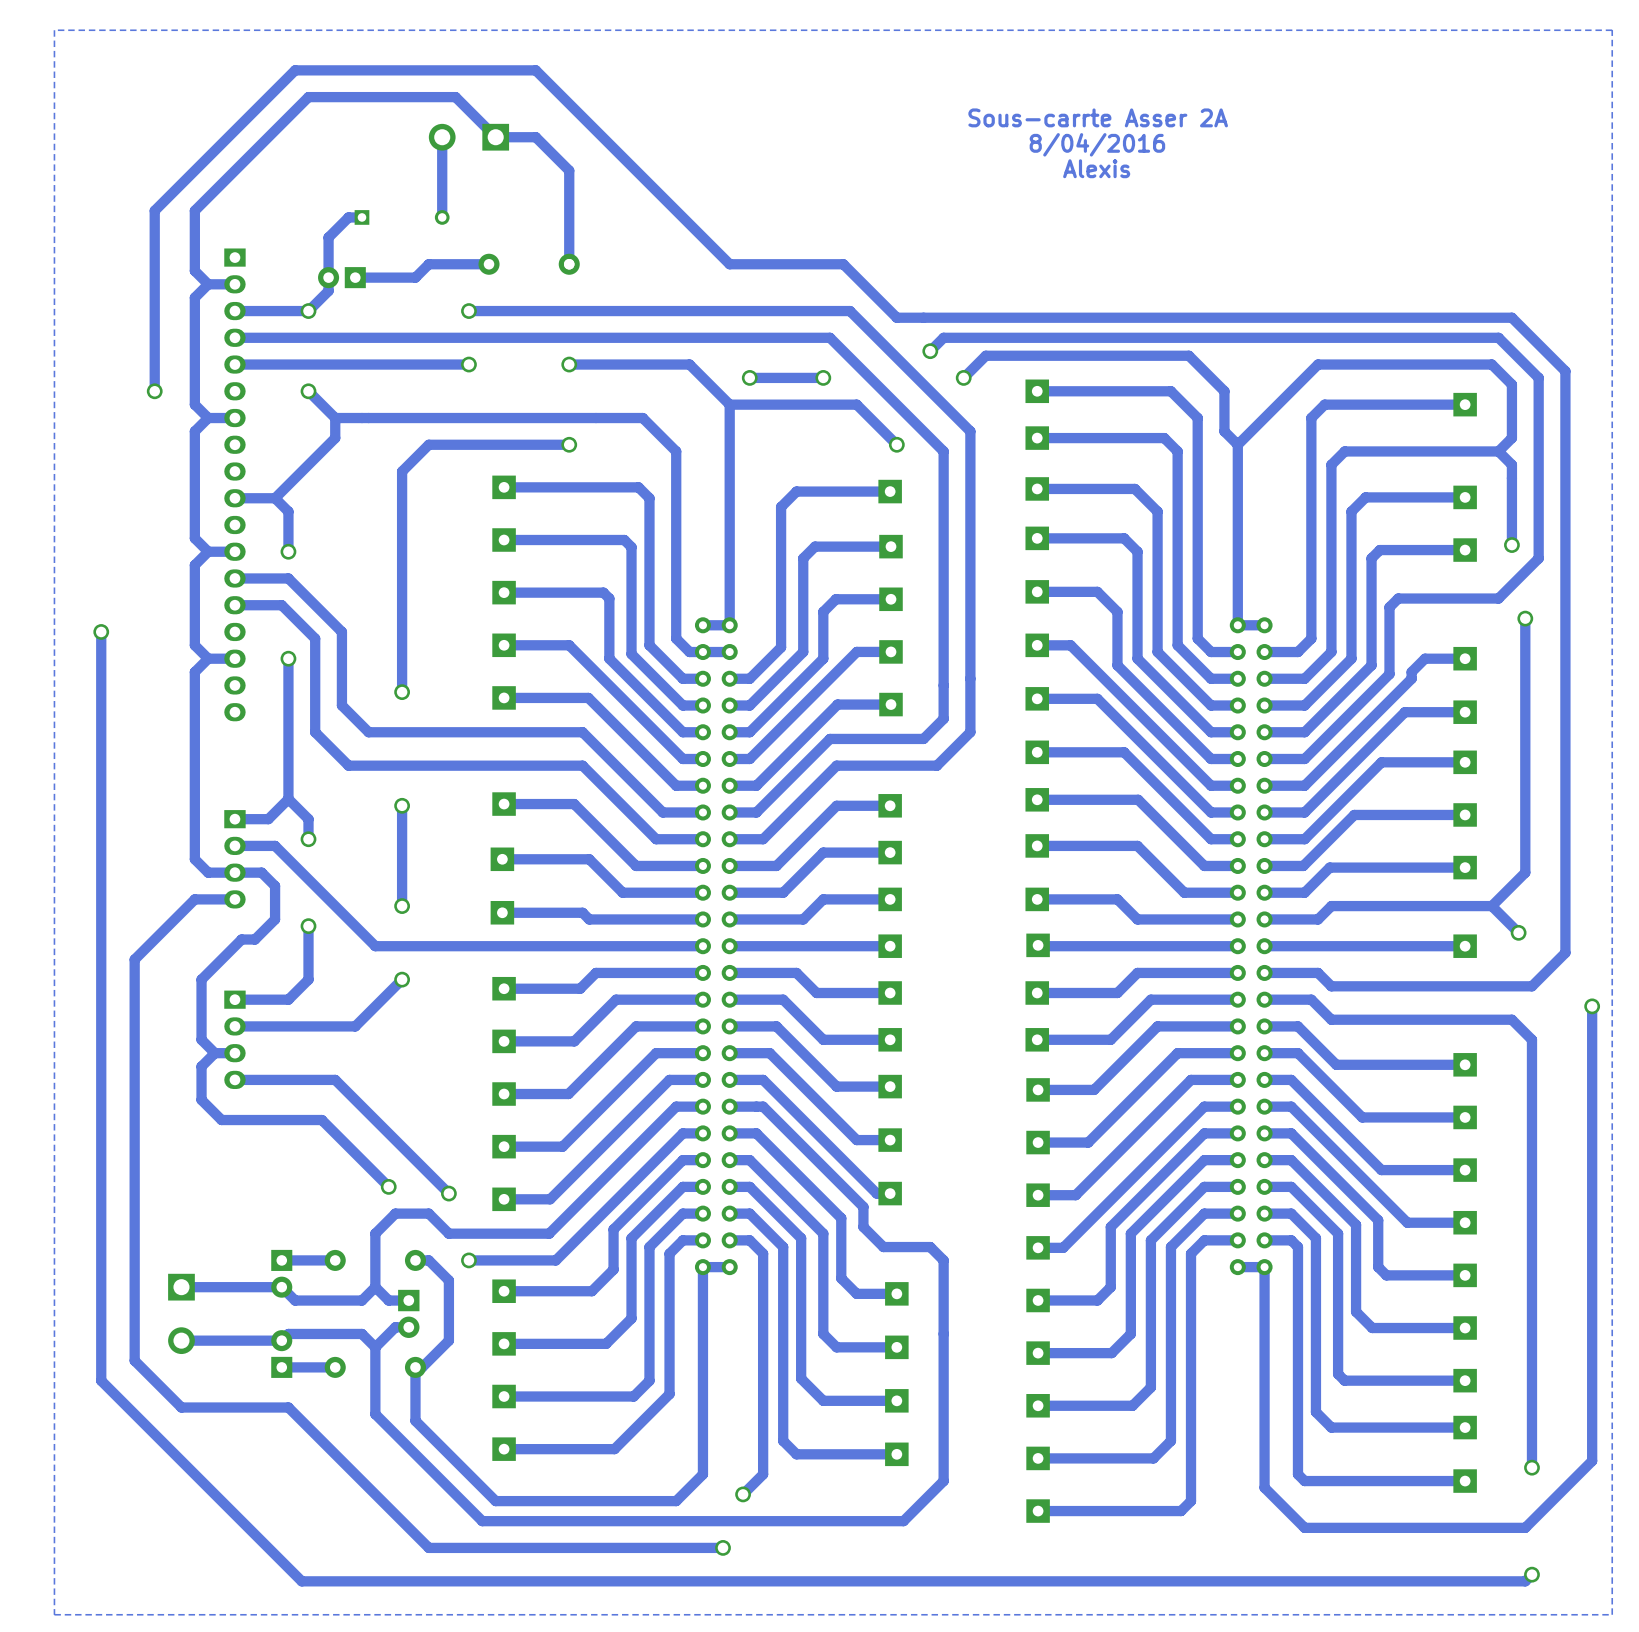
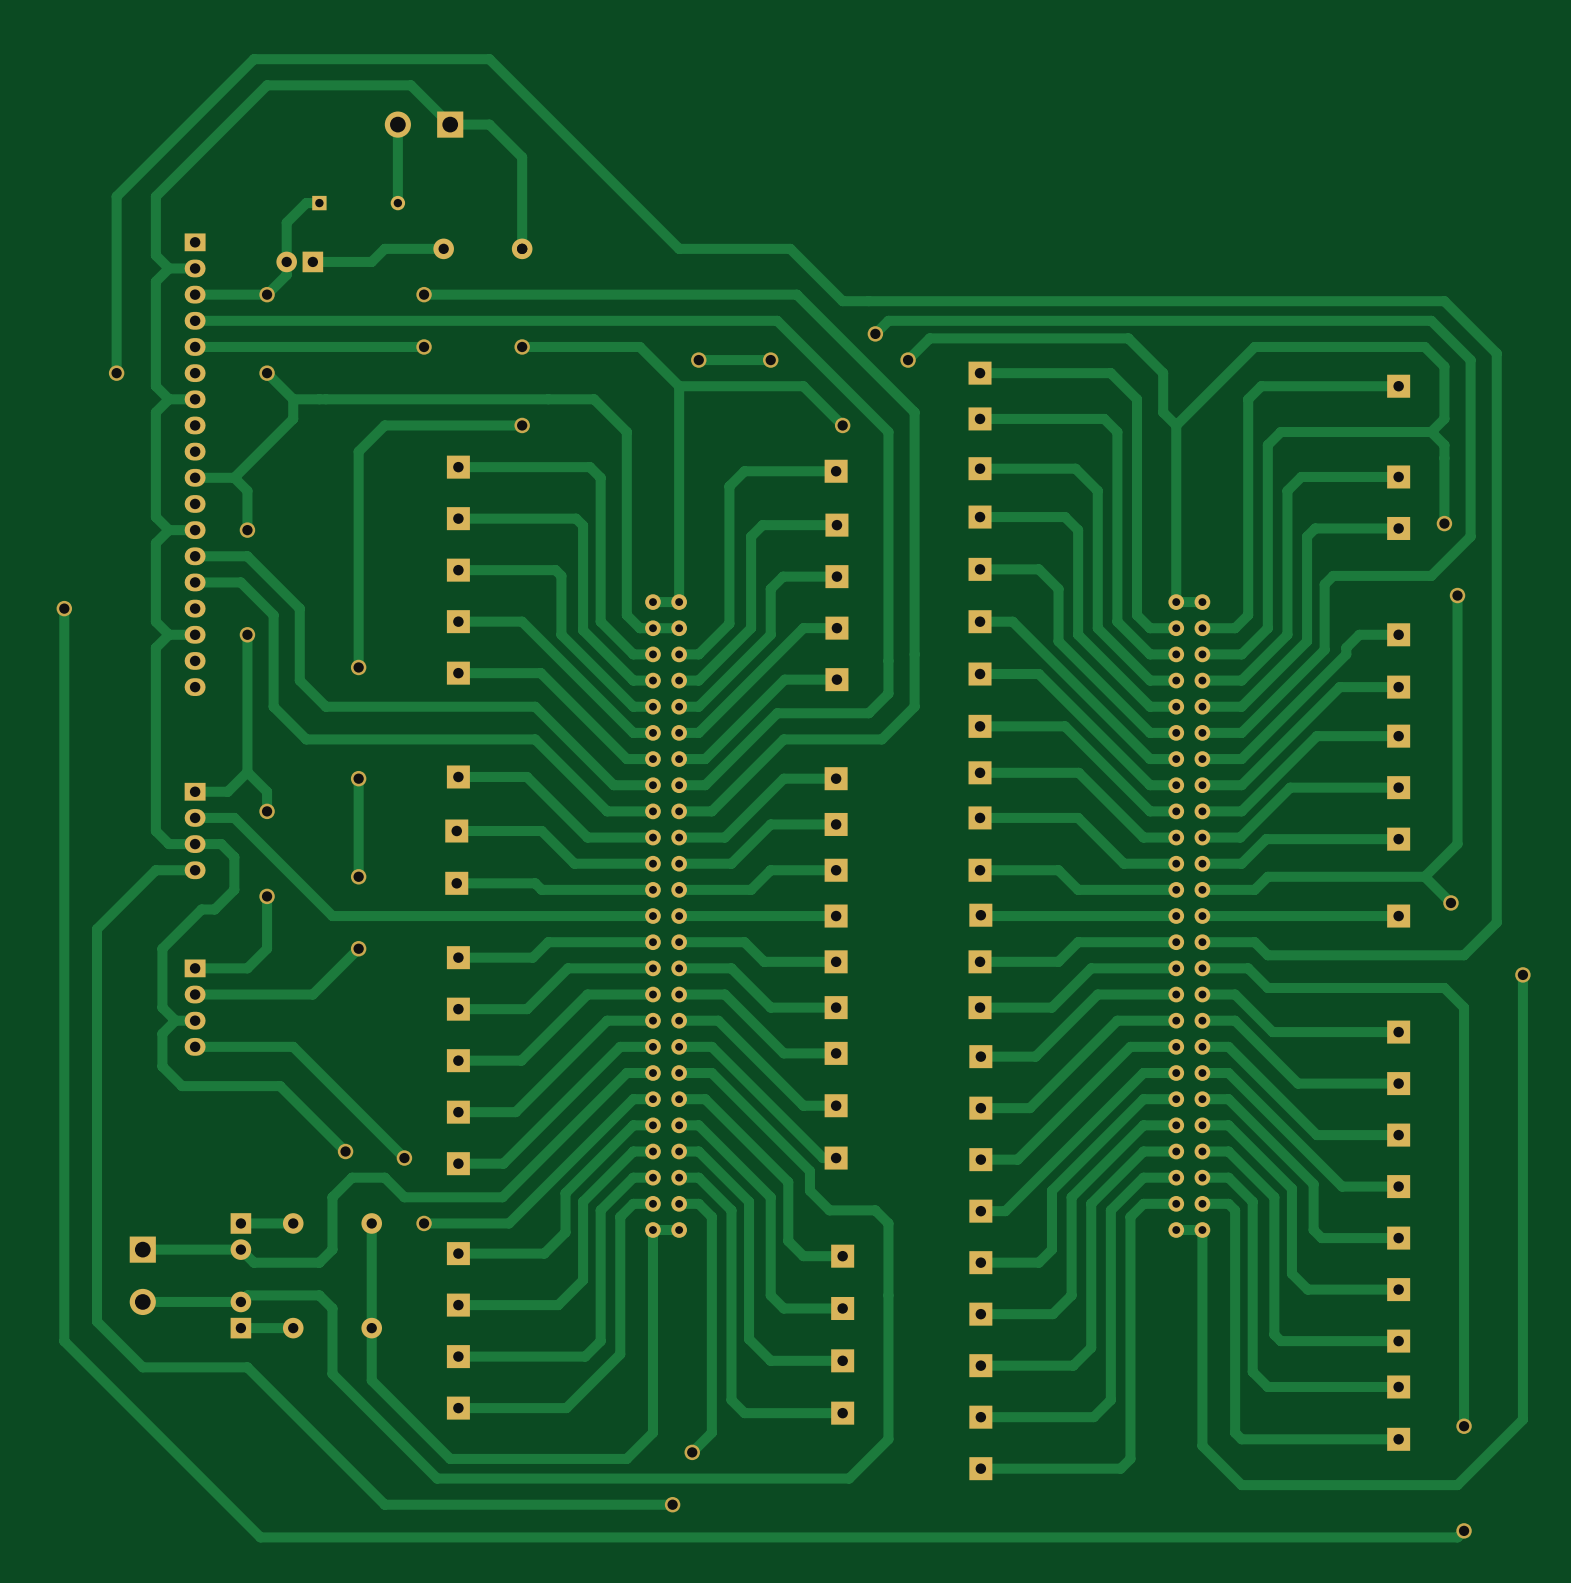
zone outline: (1612, 30) (1612, 1614) (54, 1614) (54, 30) (1612, 30) -> none
text: Sous-carrte Asser 2A (1098, 117) -> none
text: 8/04/2016 (1097, 144) -> none
text: Alexis (1096, 168) -> none
track: (415, 1260) (428, 1260) (448, 1280) (448, 1340) (422, 1367) (415, 1367) -> (371, 1223) (371, 1328)
track: (375, 1287) (388, 1300) (408, 1300) -> none
part: (408, 1313) -> none
track: (408, 1327) (395, 1327) (375, 1347) -> none

